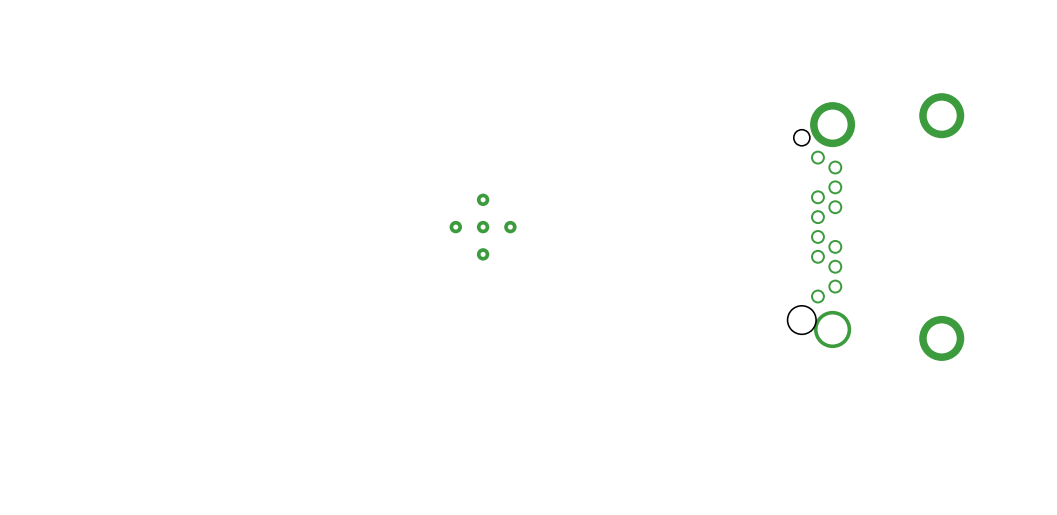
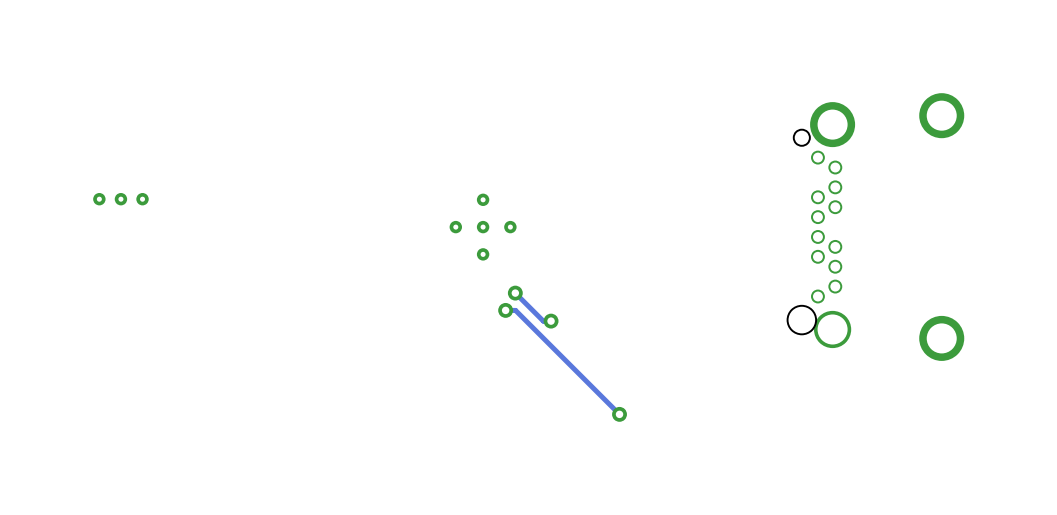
part: none -> (120, 199)
track: none -> (515, 293) (543, 321) (551, 321)
via: none -> (515, 293)
track: none -> (505, 310) (515, 310) (619, 414)
via: none -> (505, 310)
via: none -> (551, 321)
via: none -> (619, 414)

